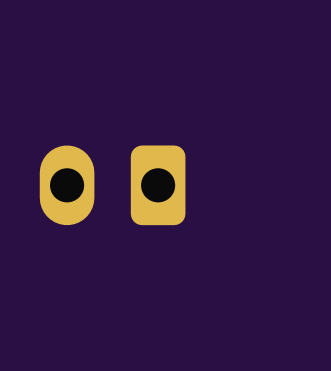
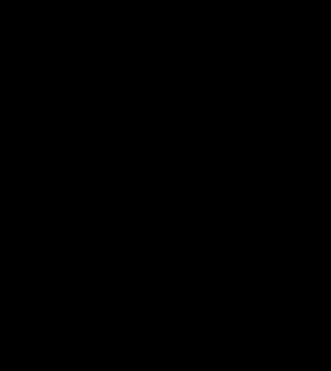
part: (112, 185) -> none

